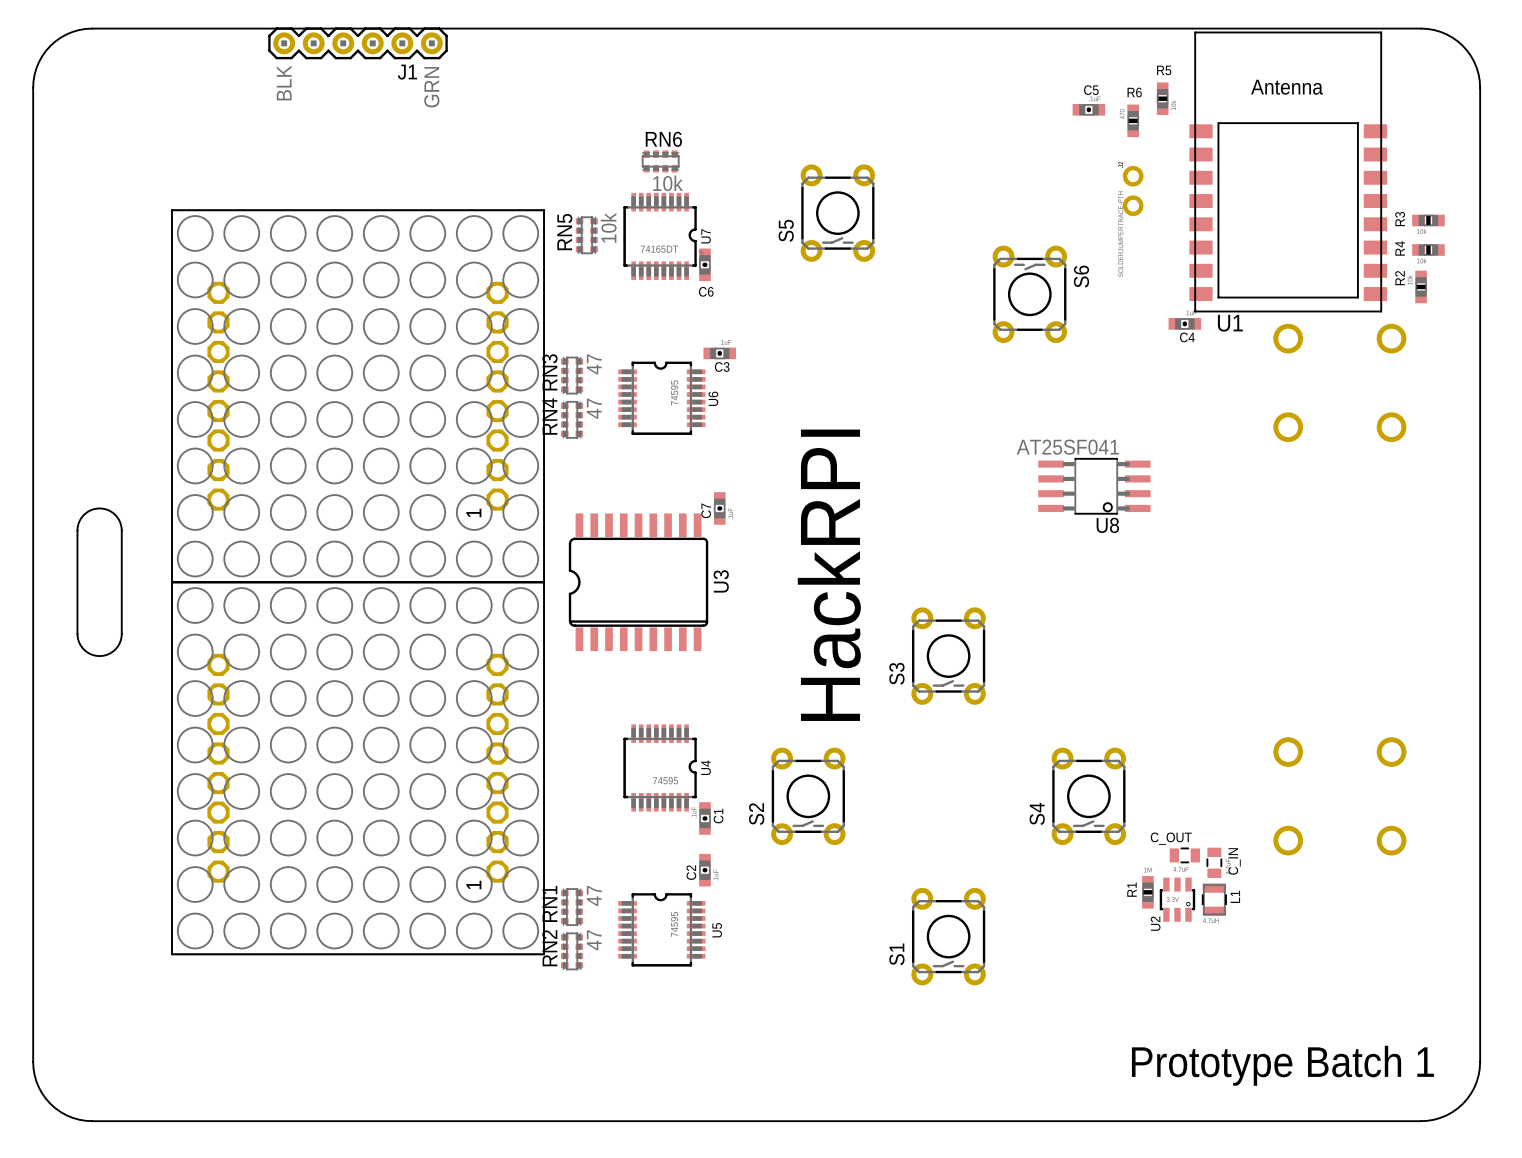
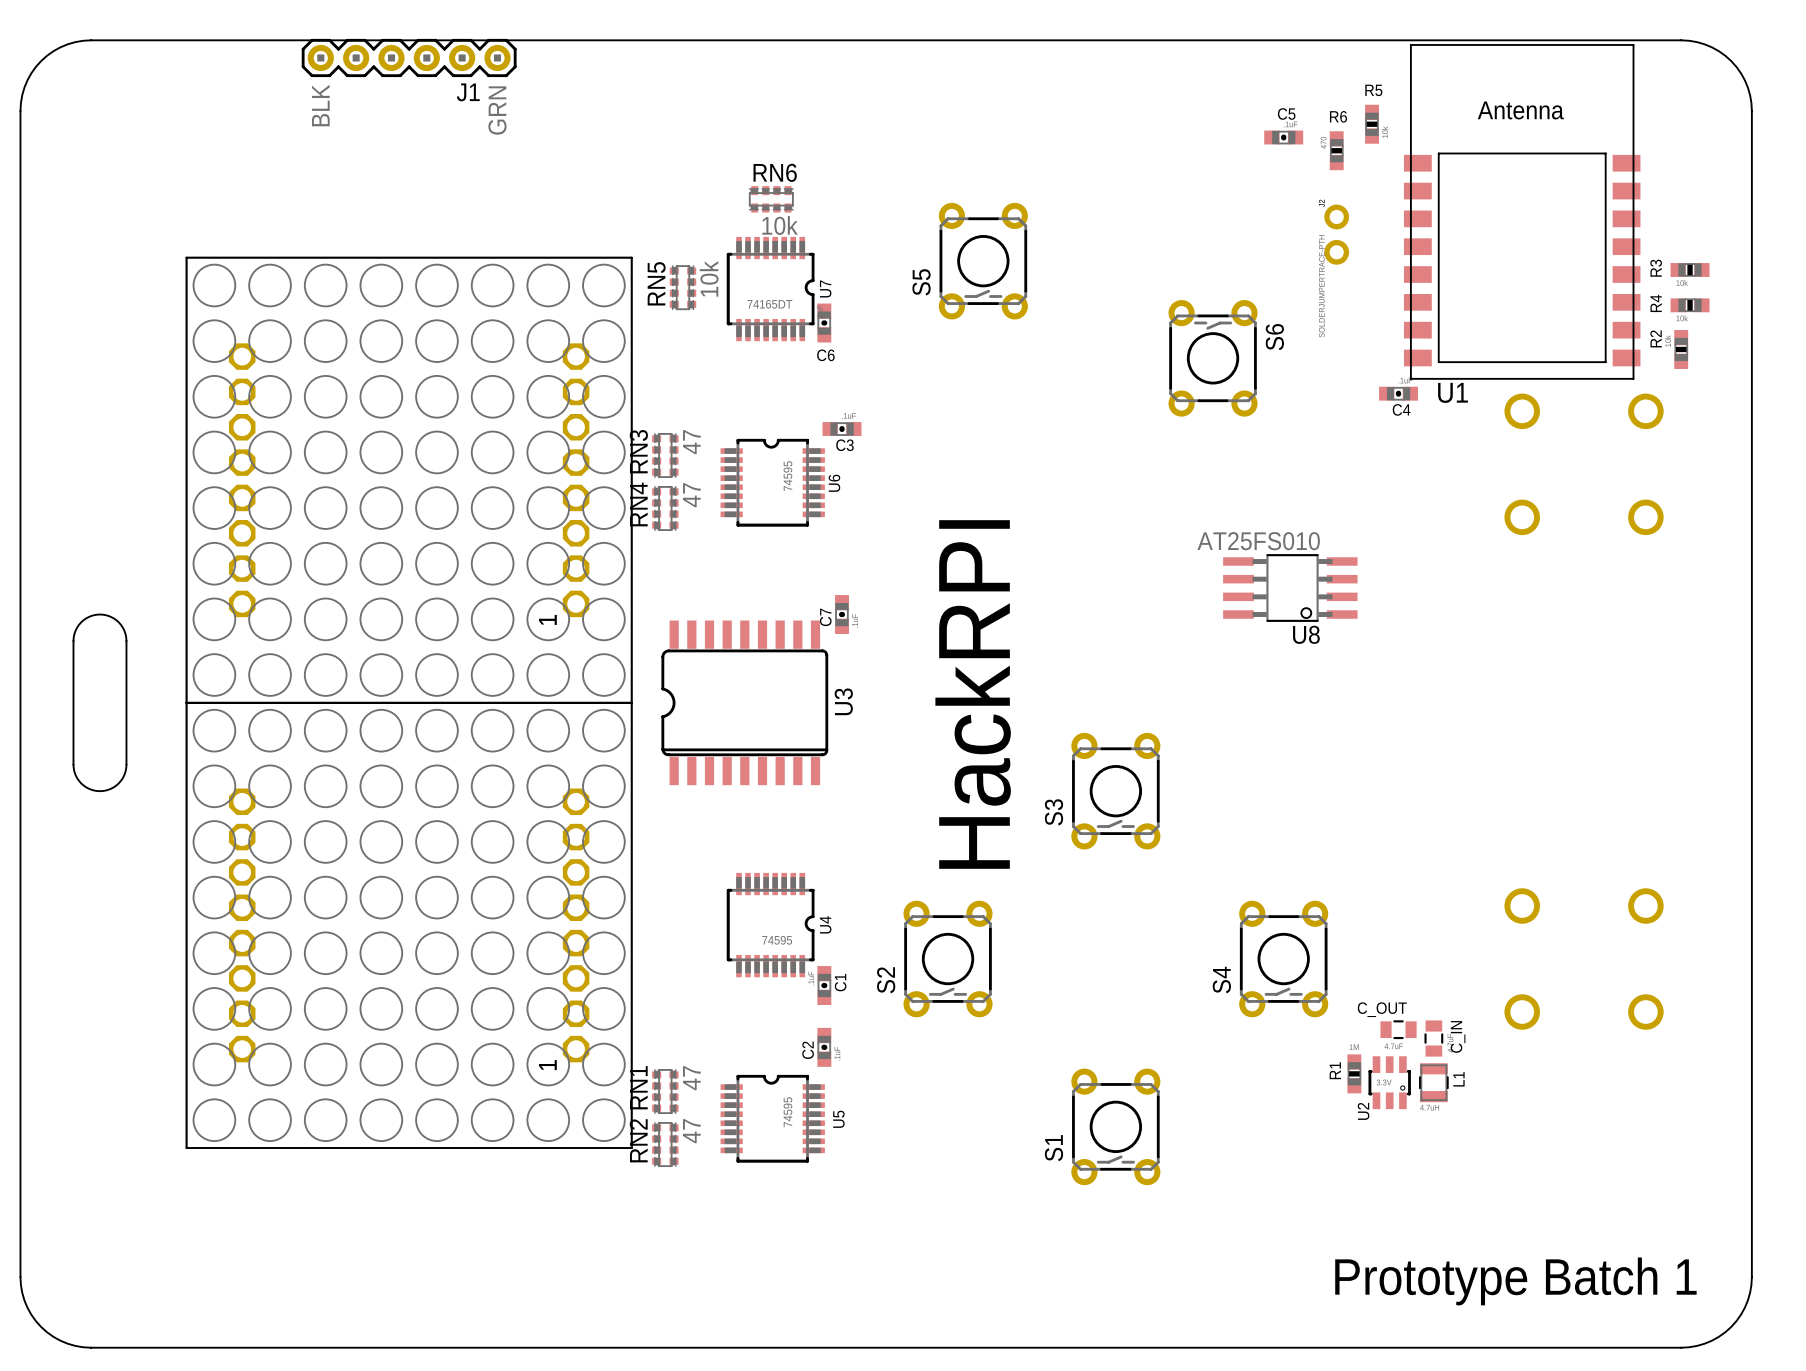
U8 value: AT25SF041 (1067, 447) -> AT25FS010 (1258, 541)

